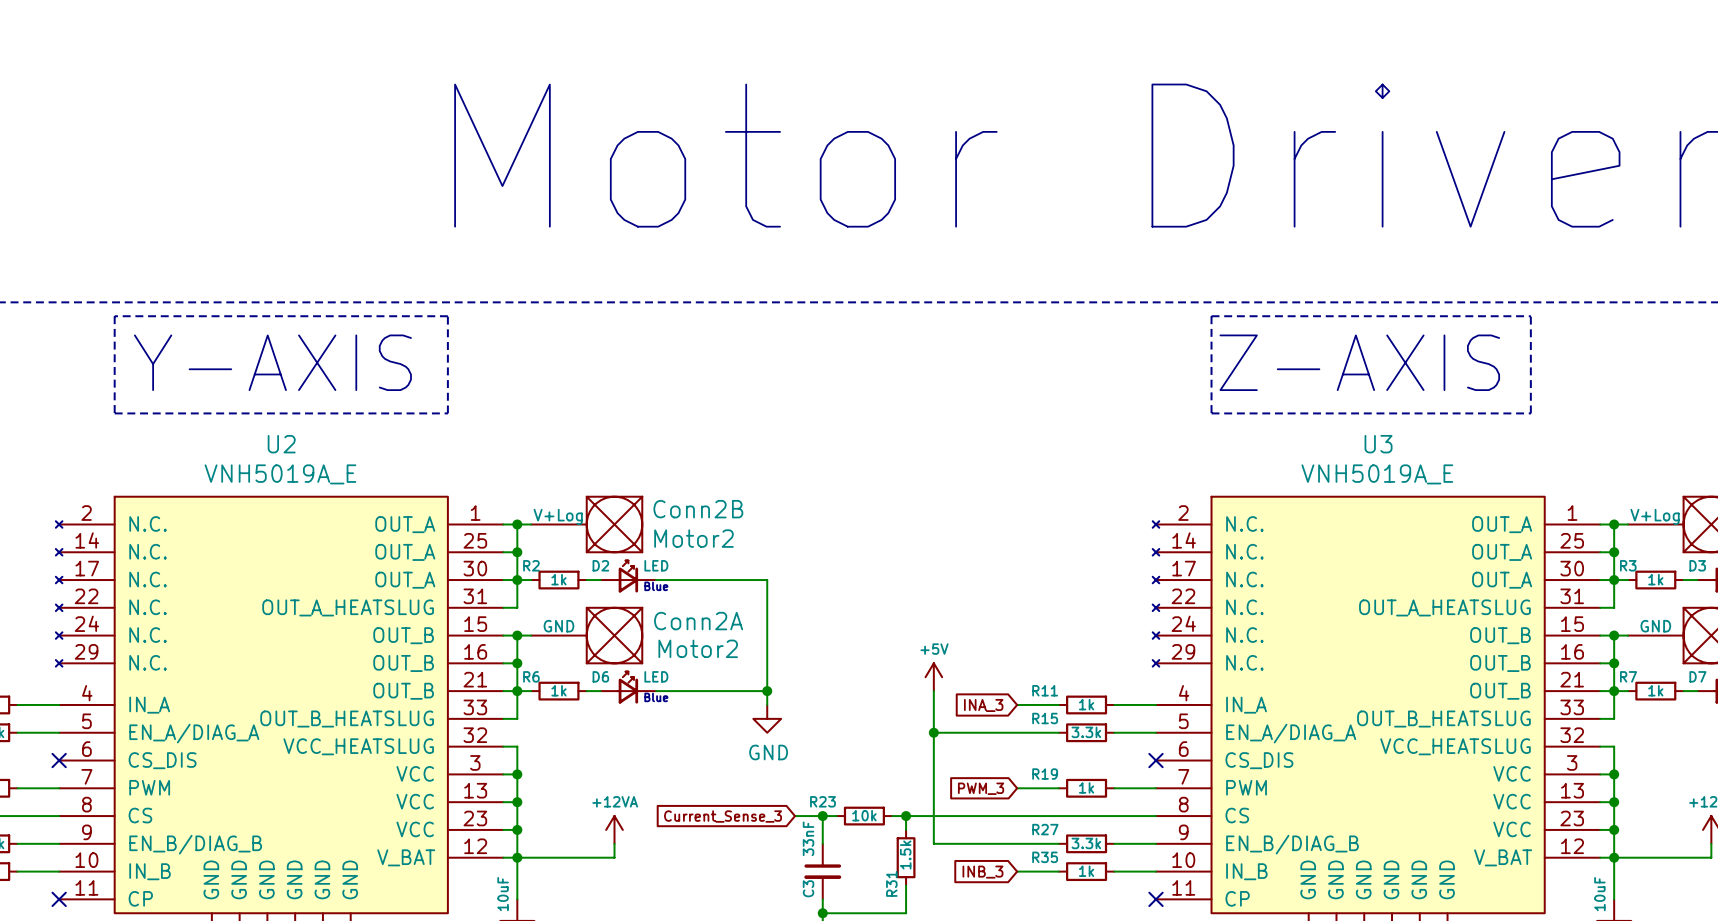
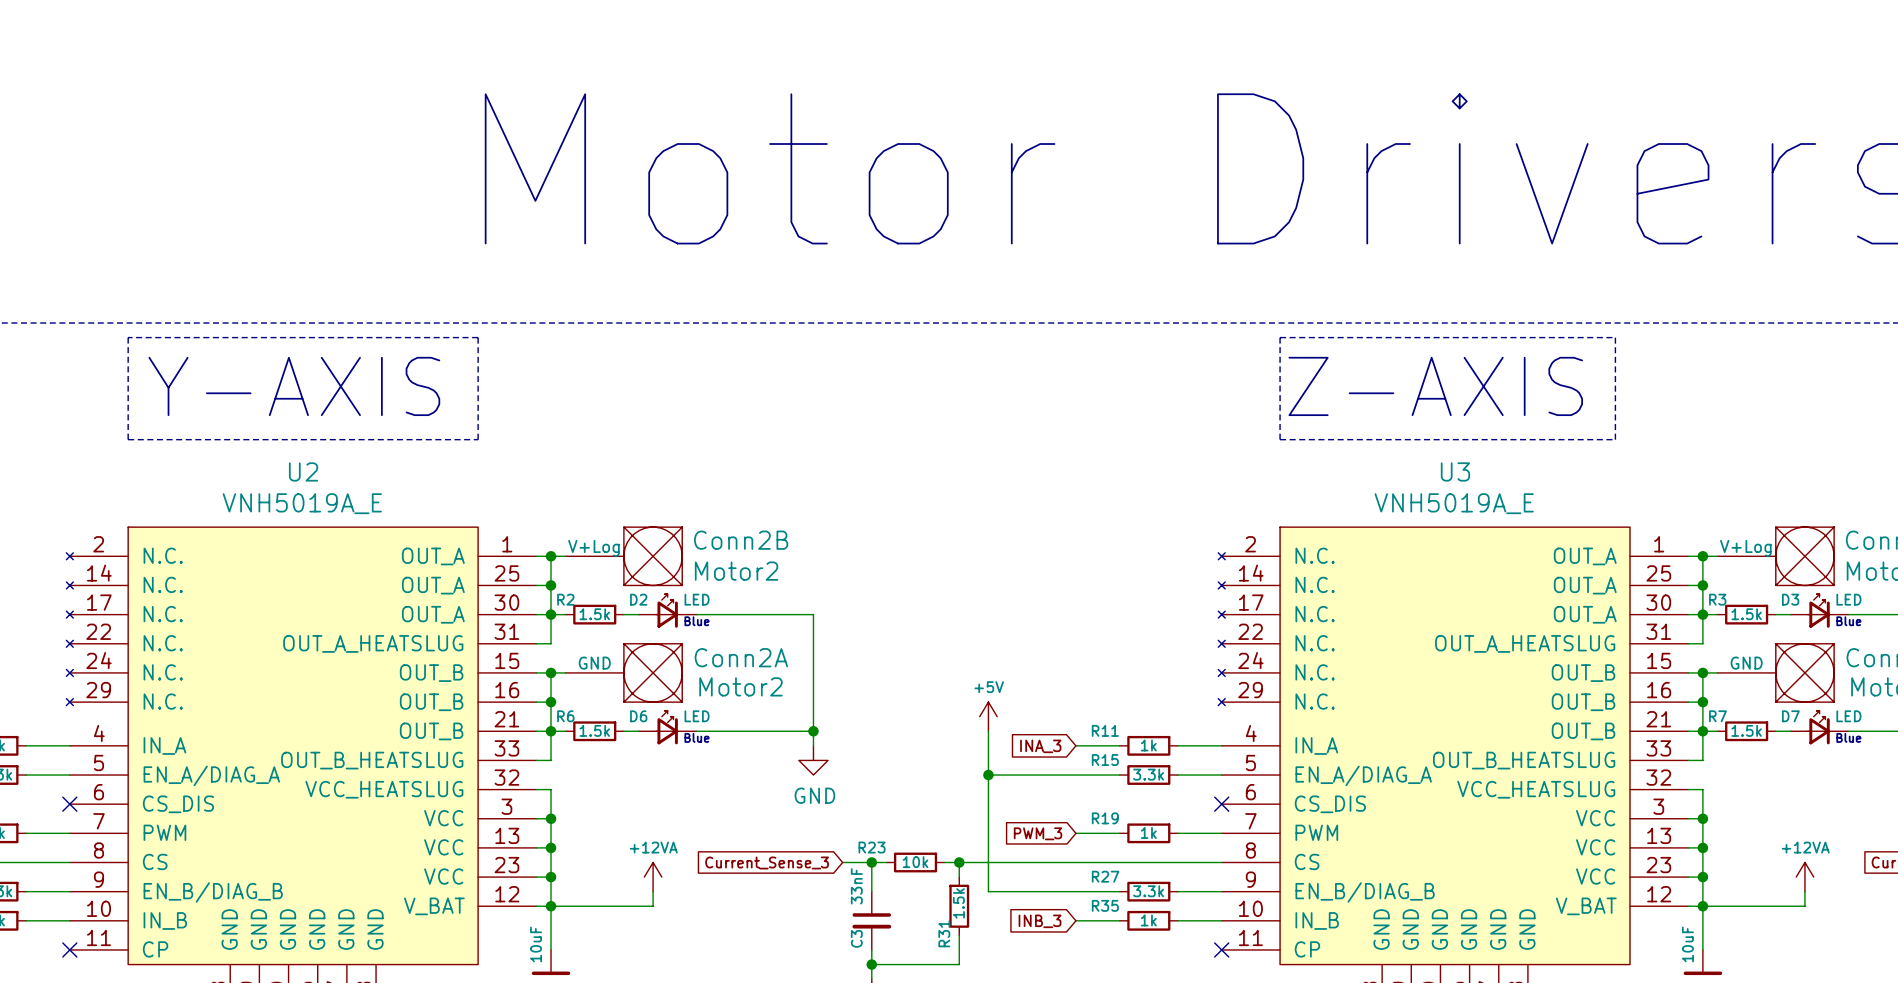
R2 value: 1k (558, 579) -> 1.5k (594, 614)
R3 value: 1k (1655, 579) -> 1.5k (1746, 614)
R6 value: 1k (558, 690) -> 1.5k (594, 730)
R7 value: 1k (1655, 690) -> 1.5k (1746, 730)

